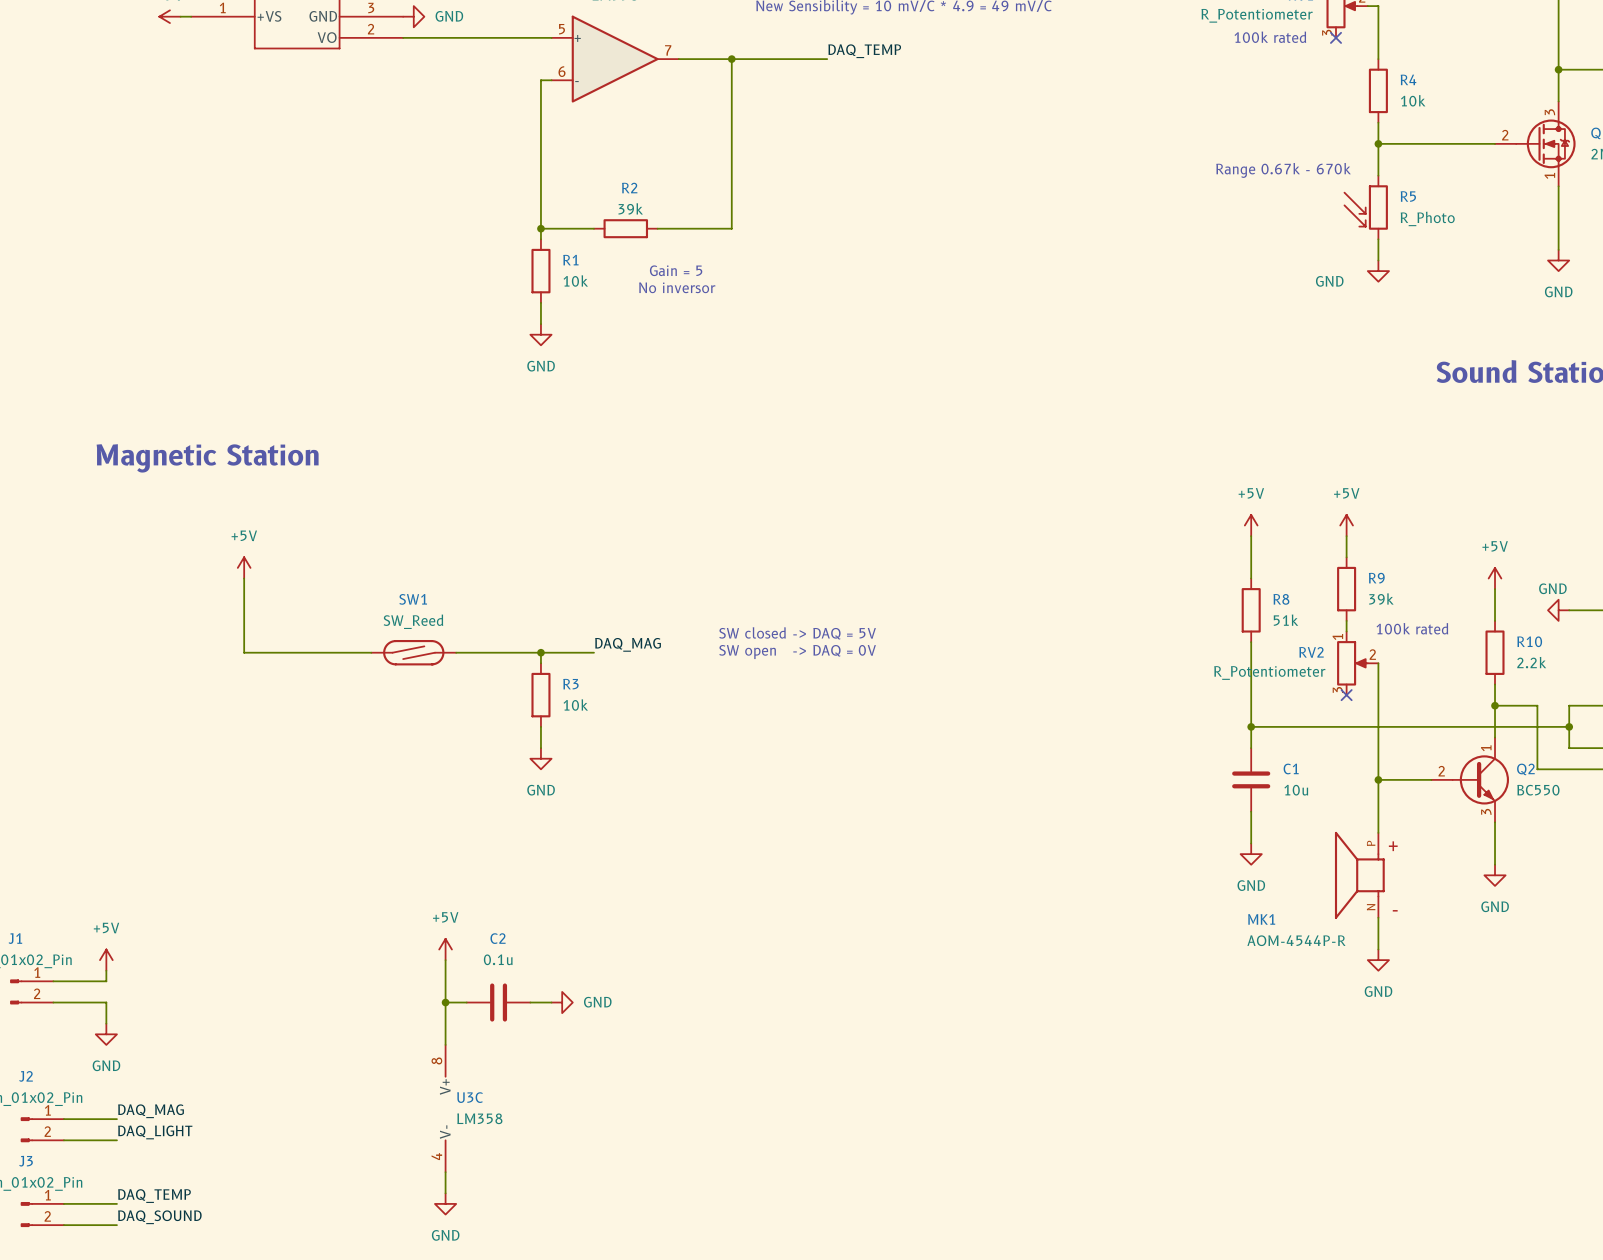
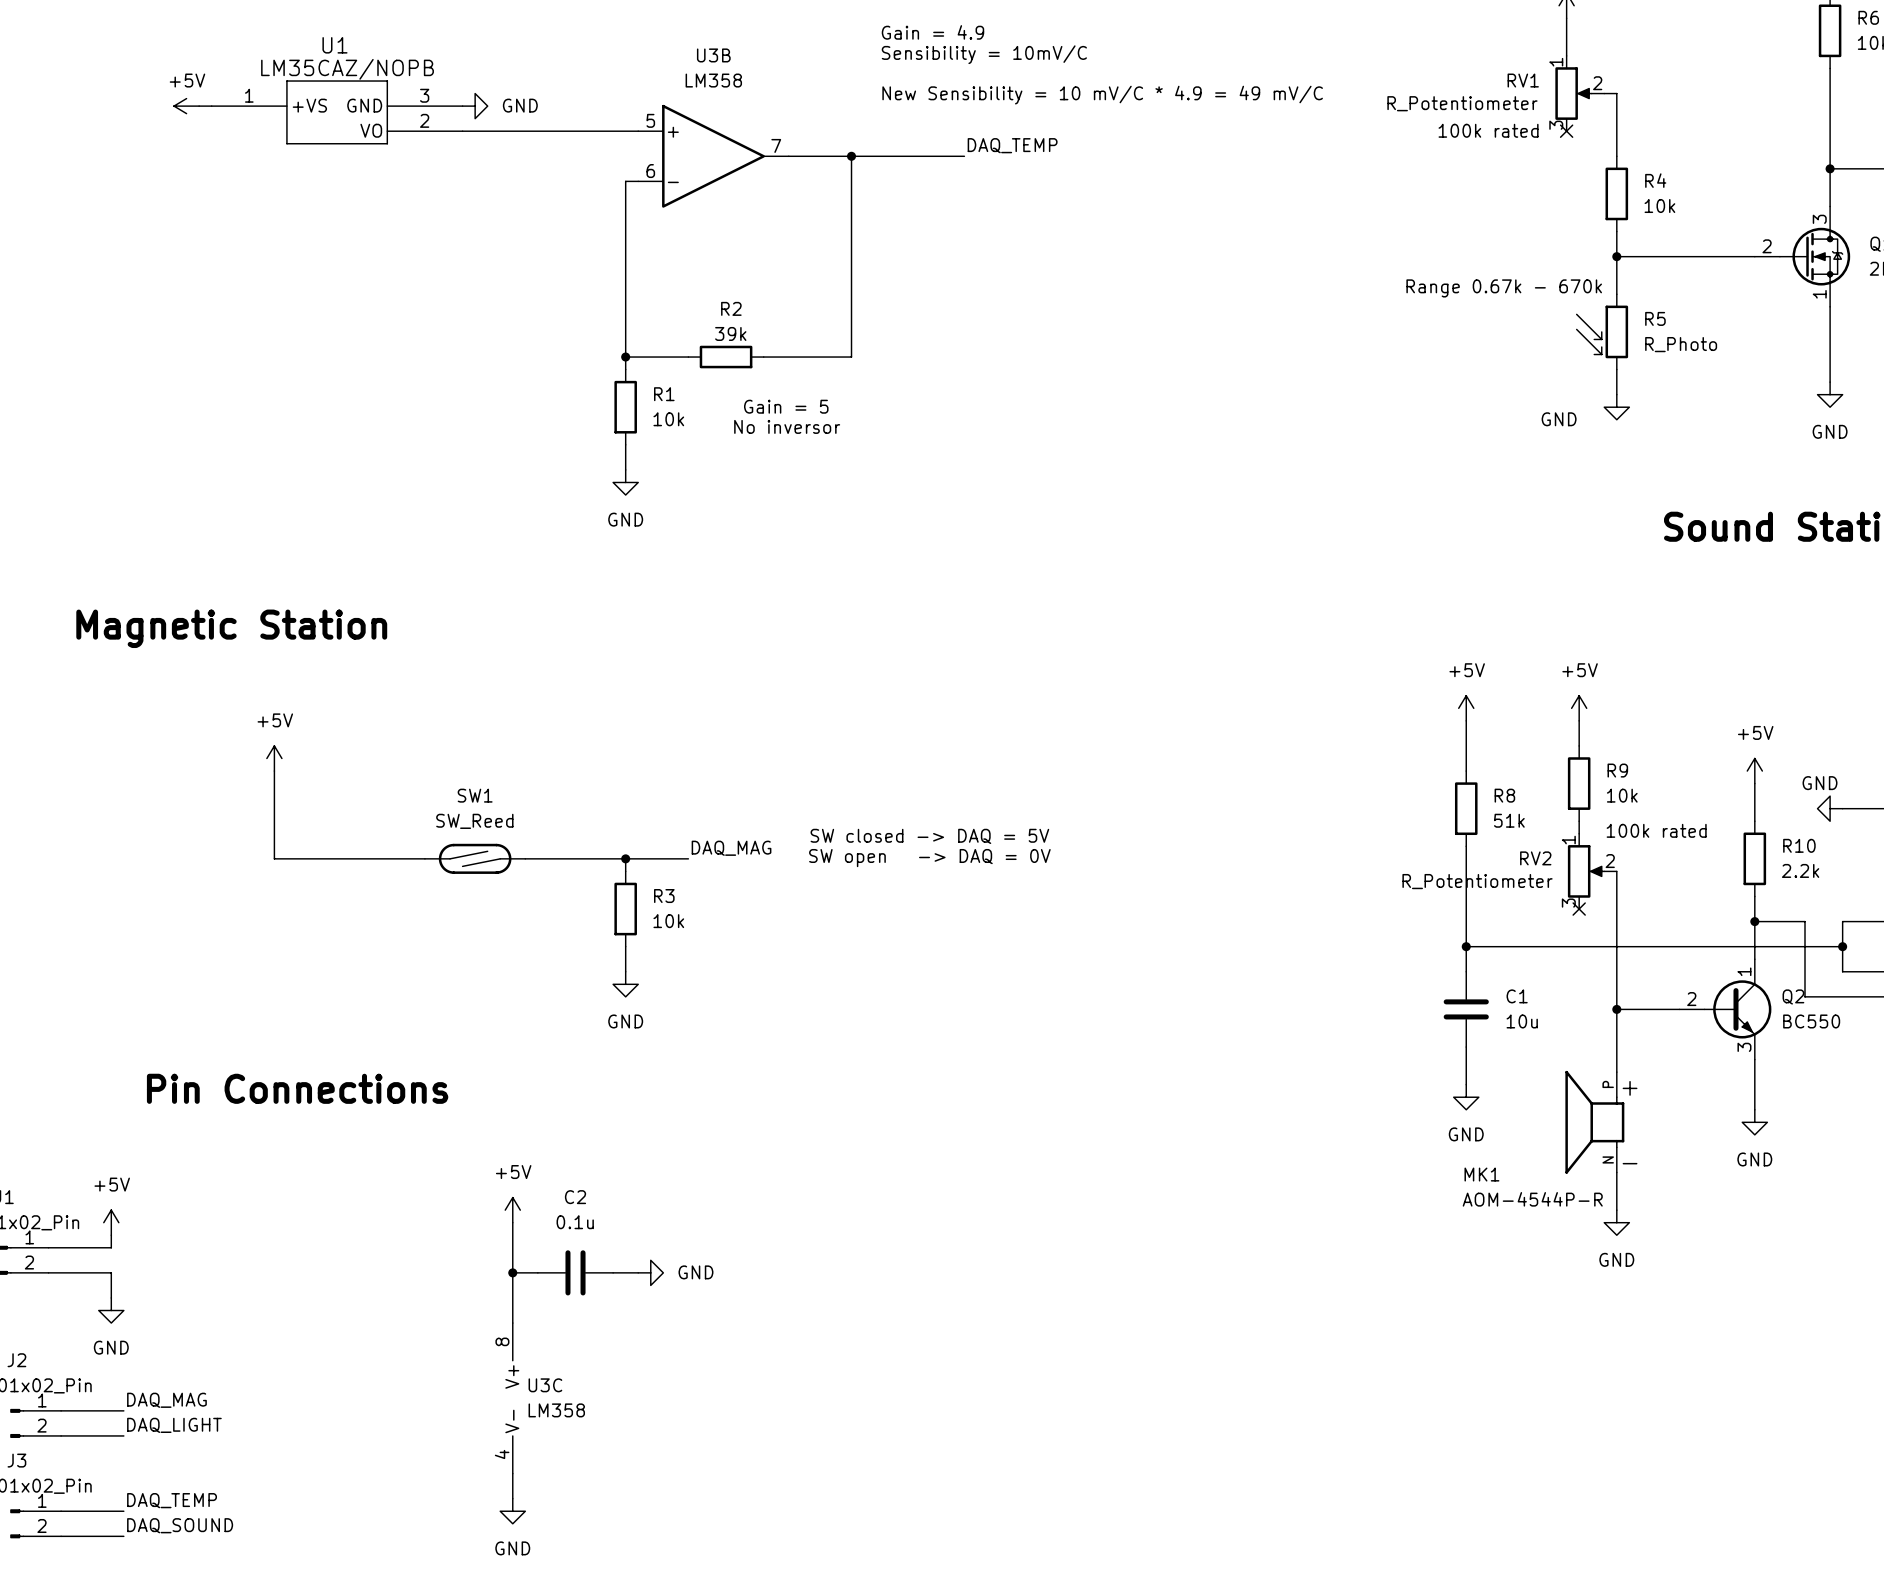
R9 value: 39k (1381, 599) -> 10k (1622, 795)
text: none -> Pin Connections (297, 1088)

